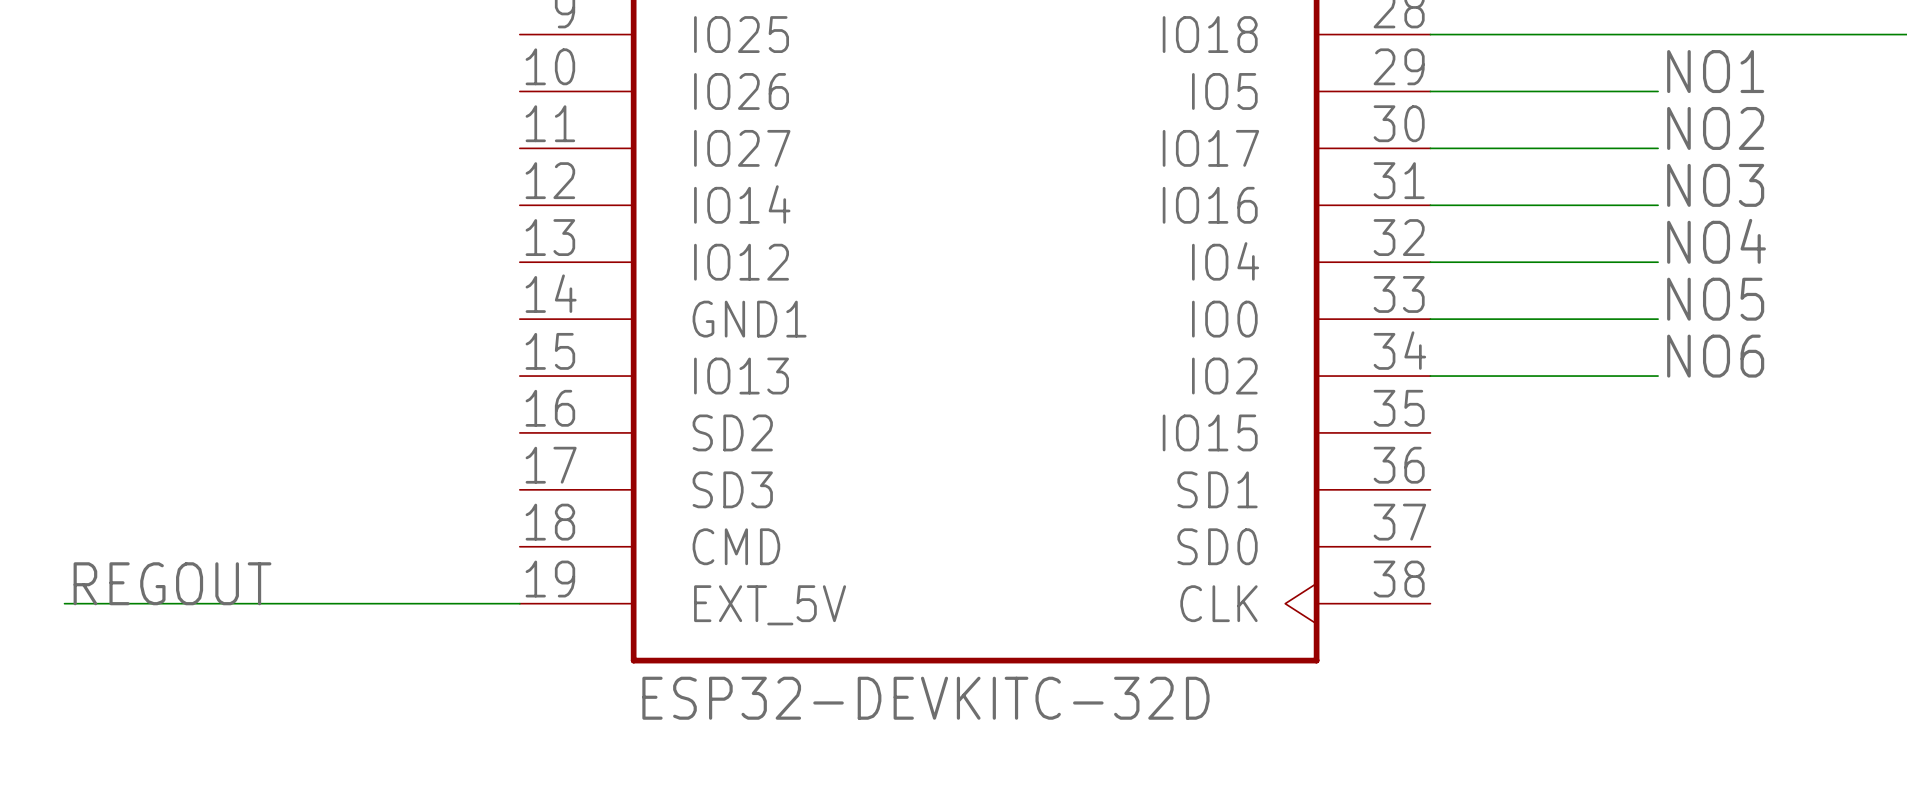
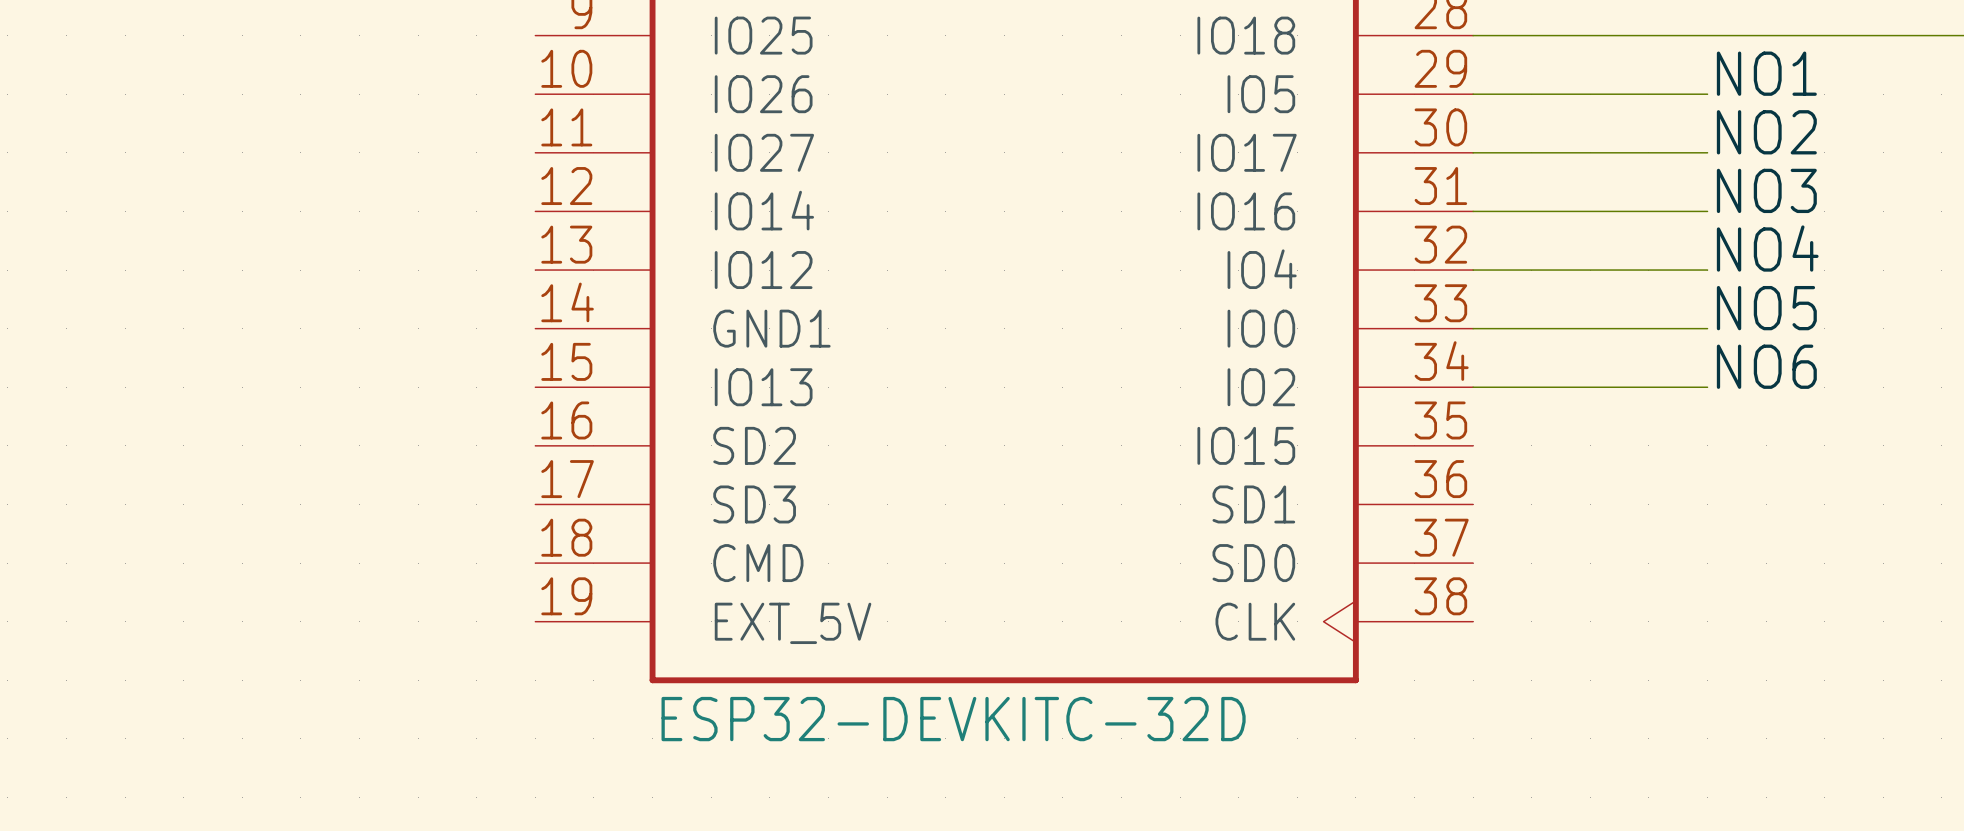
label: REGOUT (172, 583) -> none
wire: (64, 603) (519, 603) -> none

